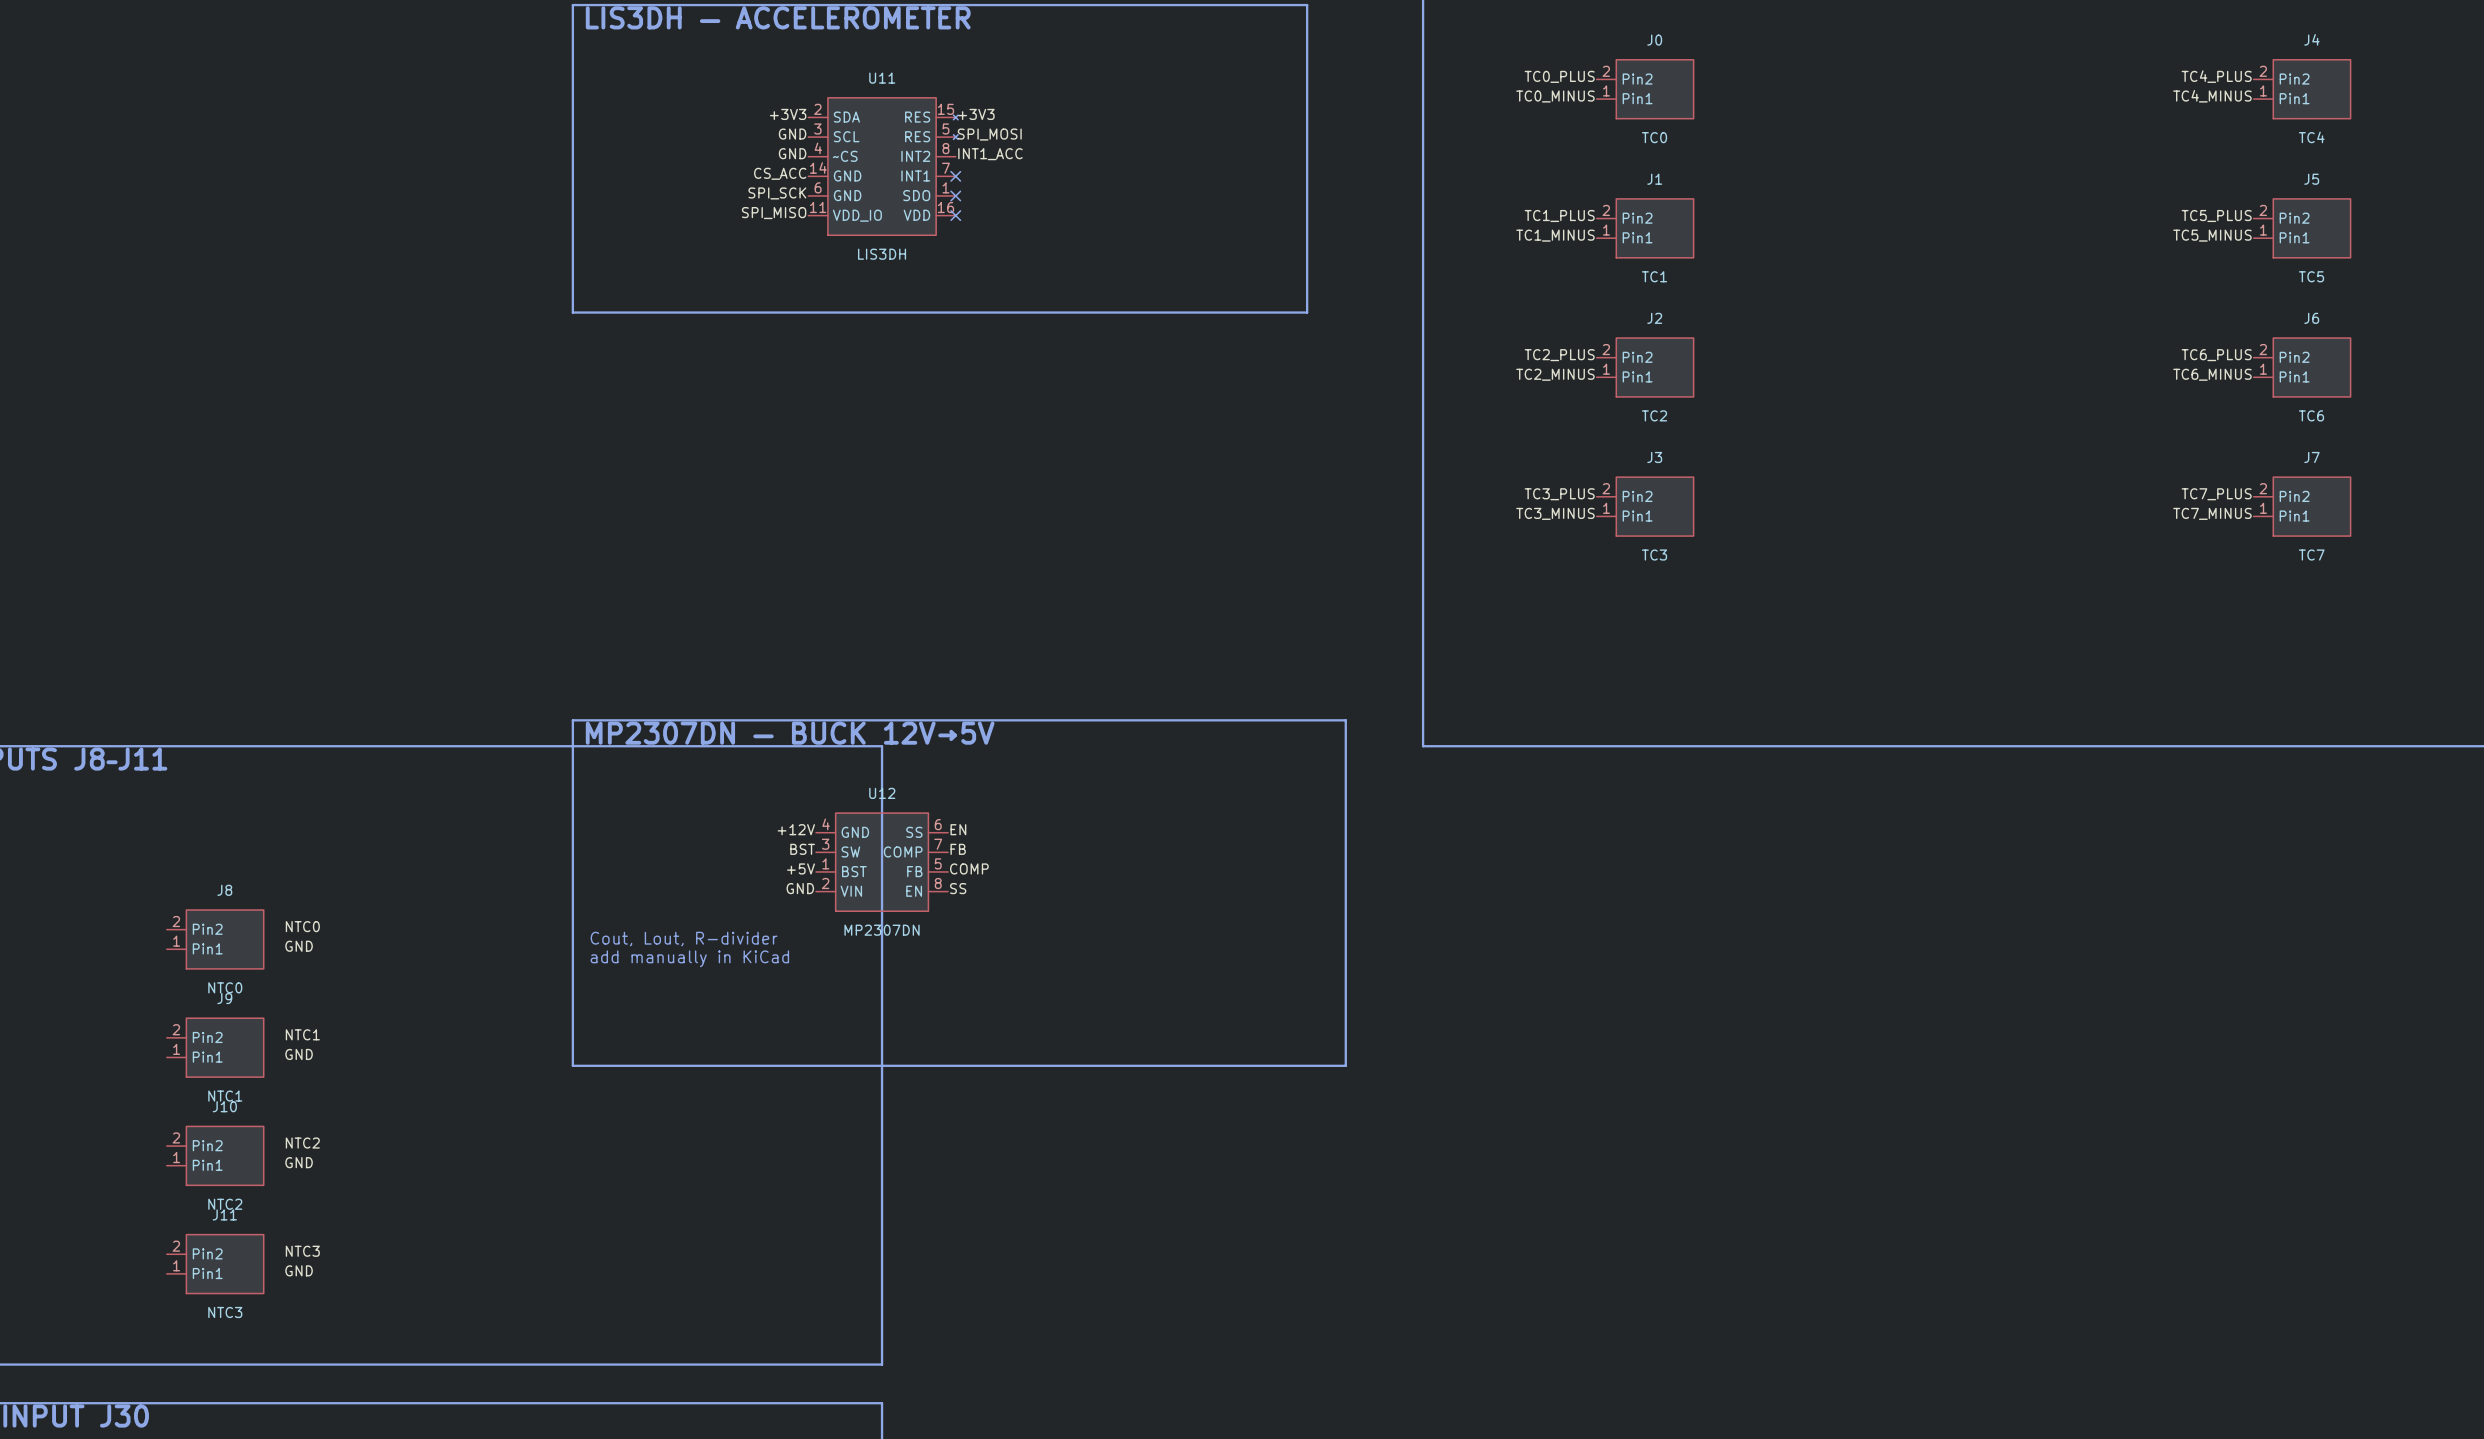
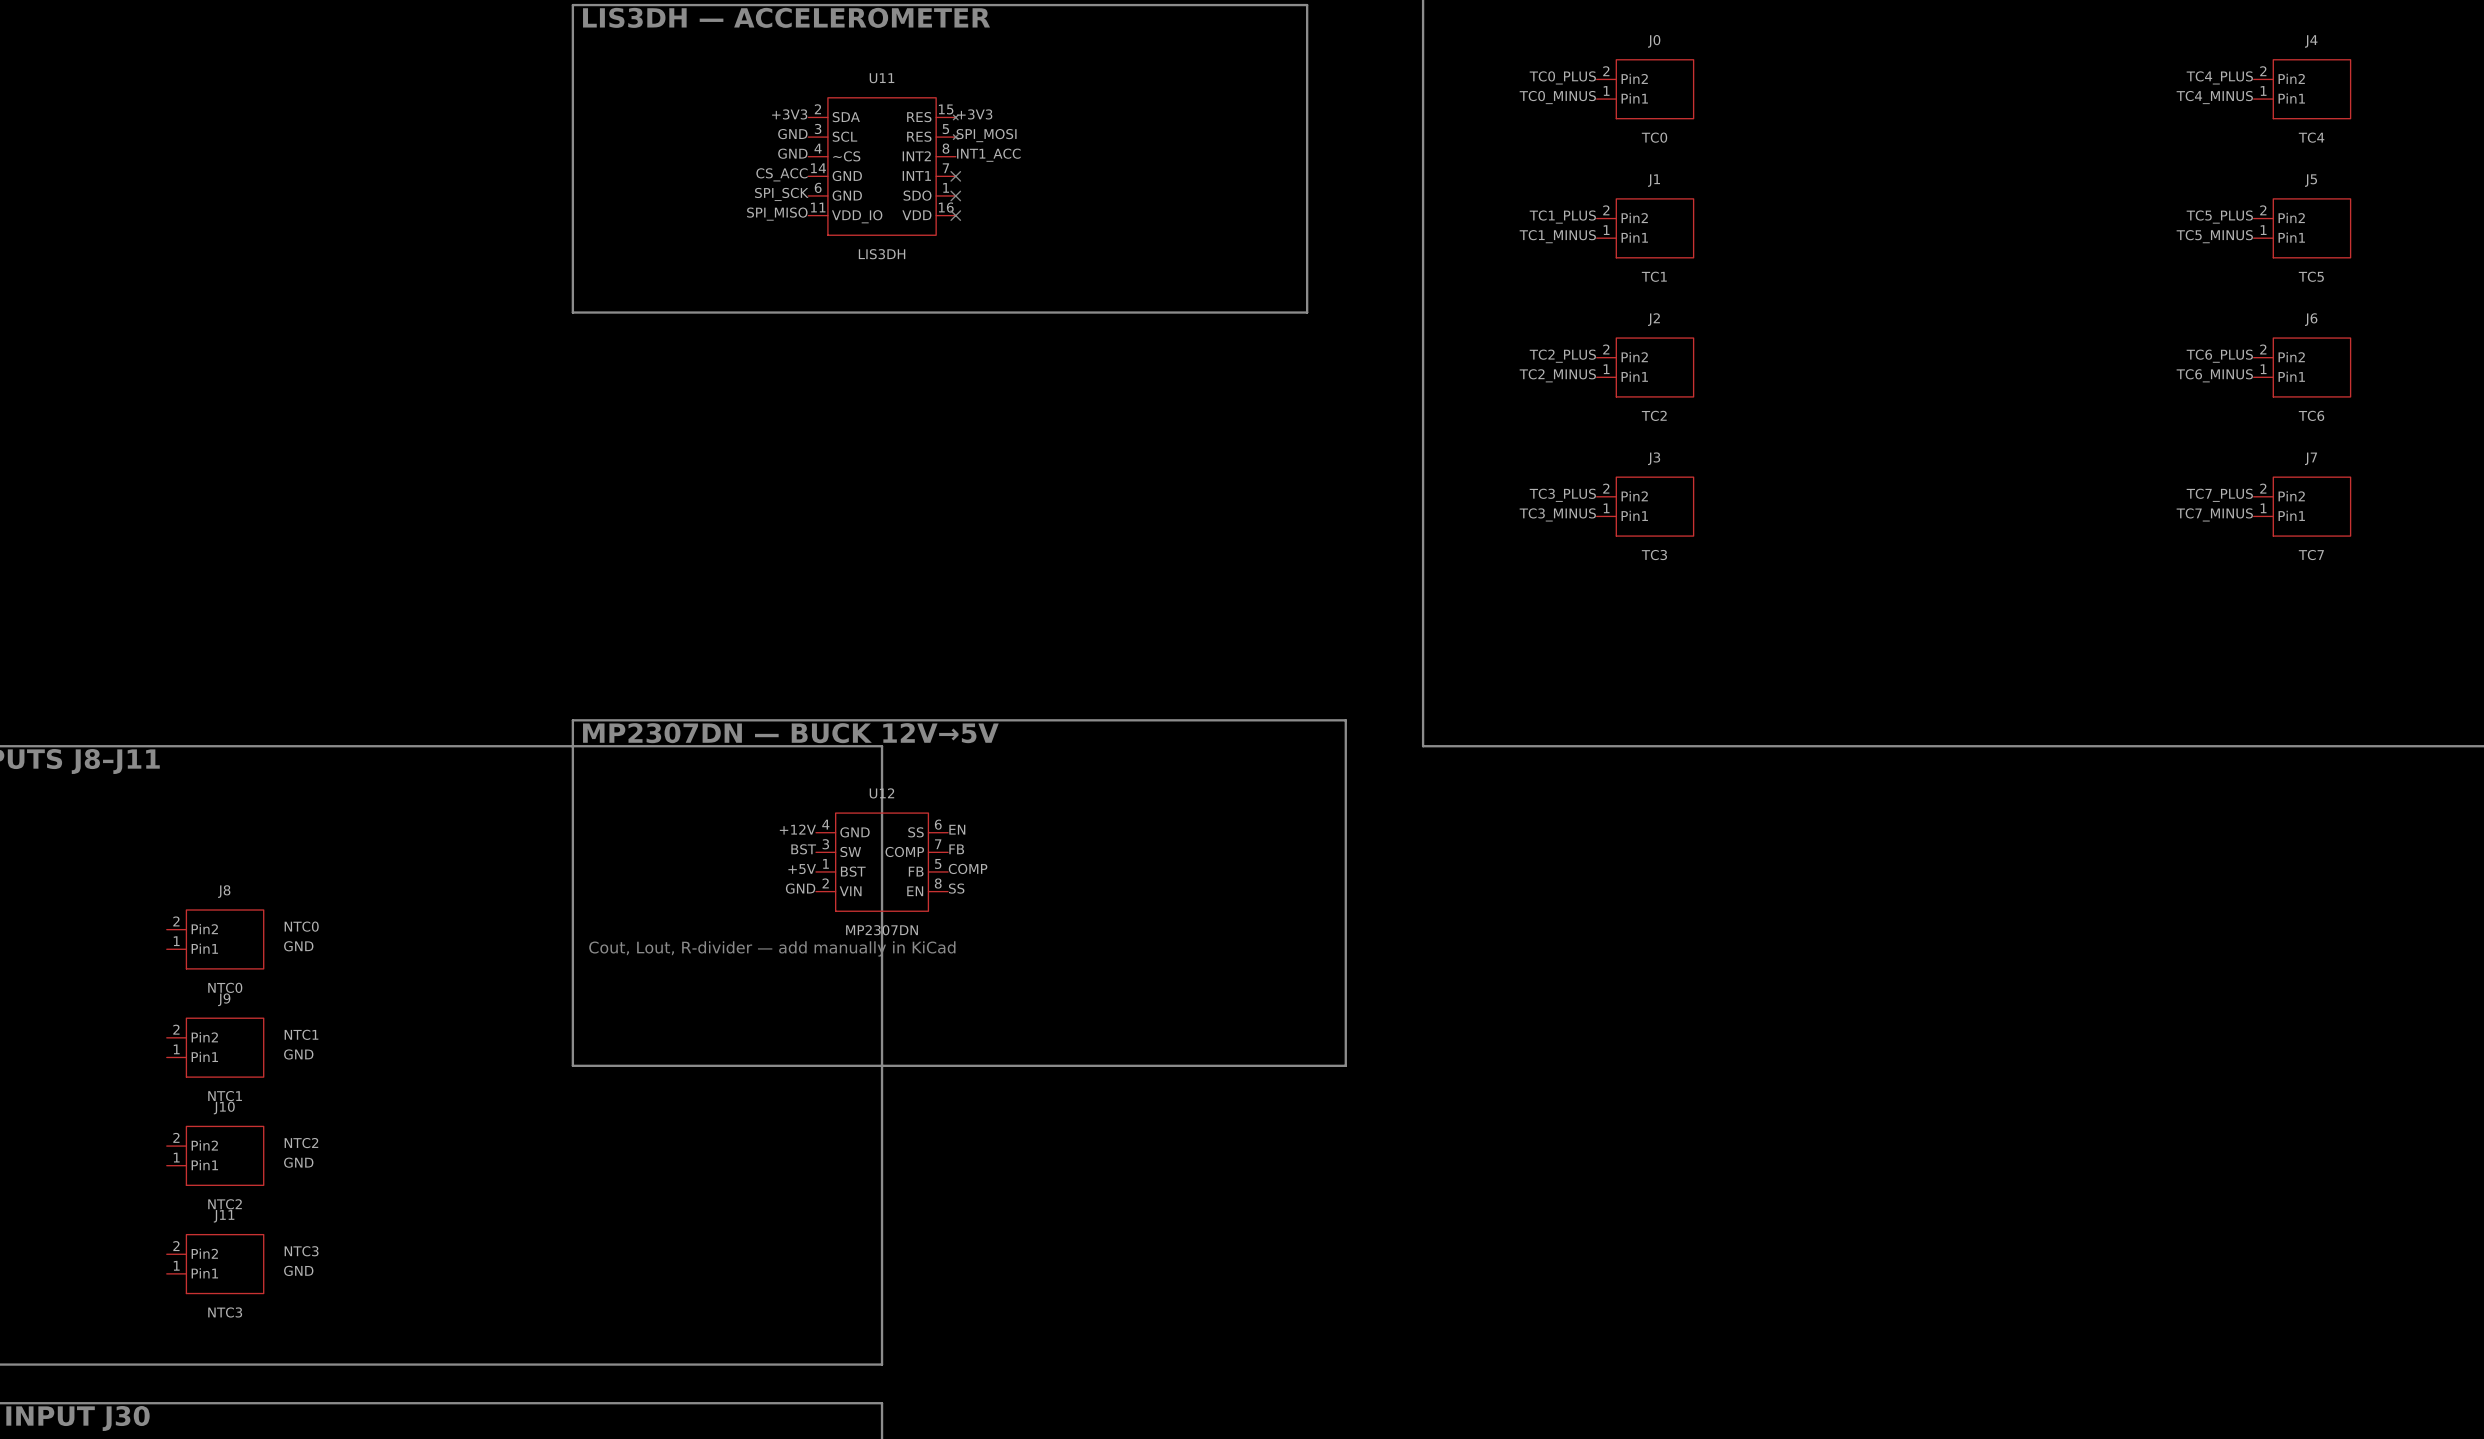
text: Cout, Lout, R-divider (684, 939) -> none
text: none -> Cout, Lout, R-divider — add manually in KiCad (772, 948)
text: add manually in KiCad (689, 958) -> none

